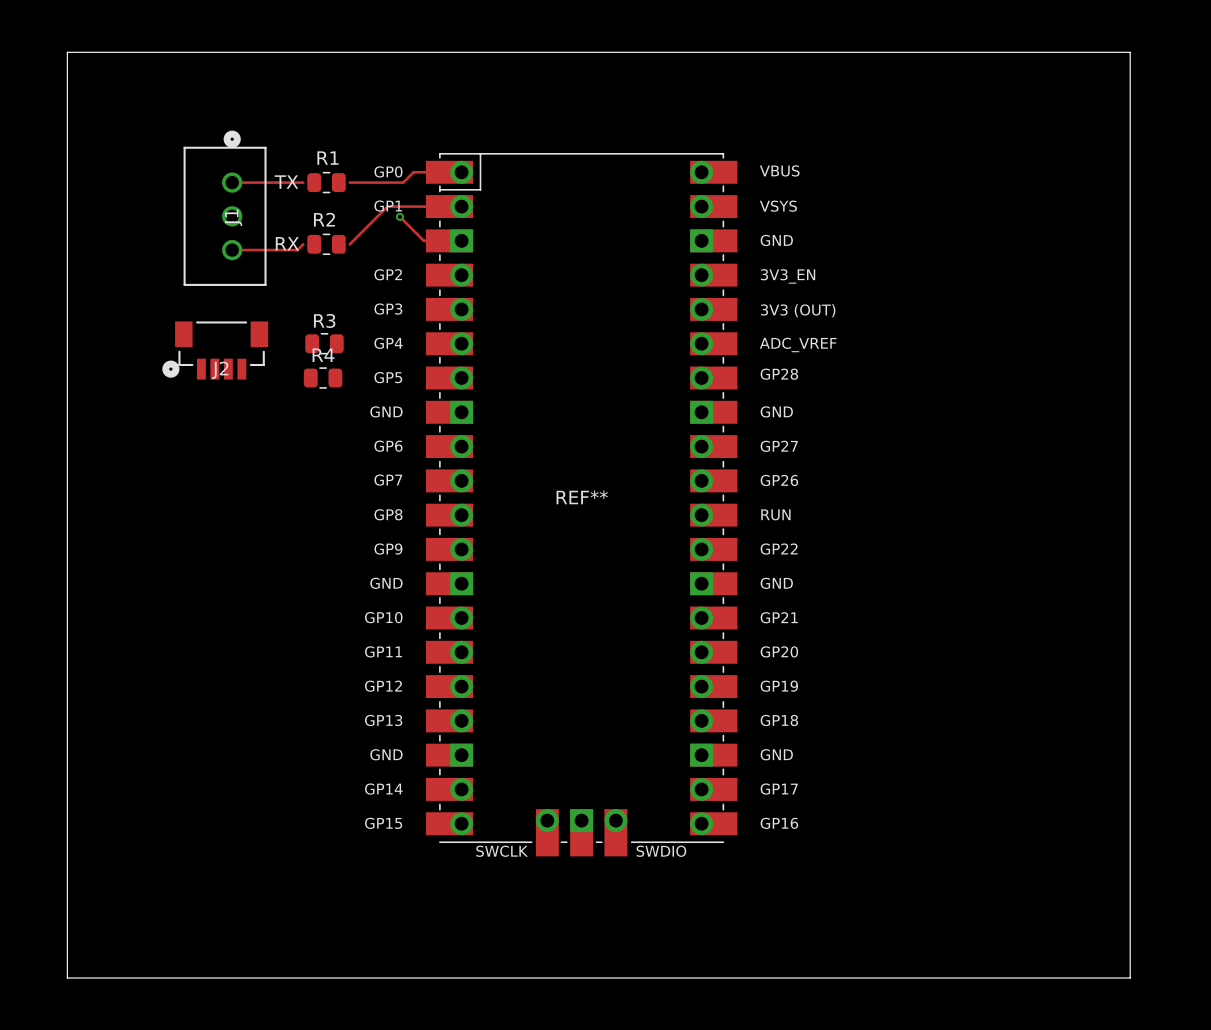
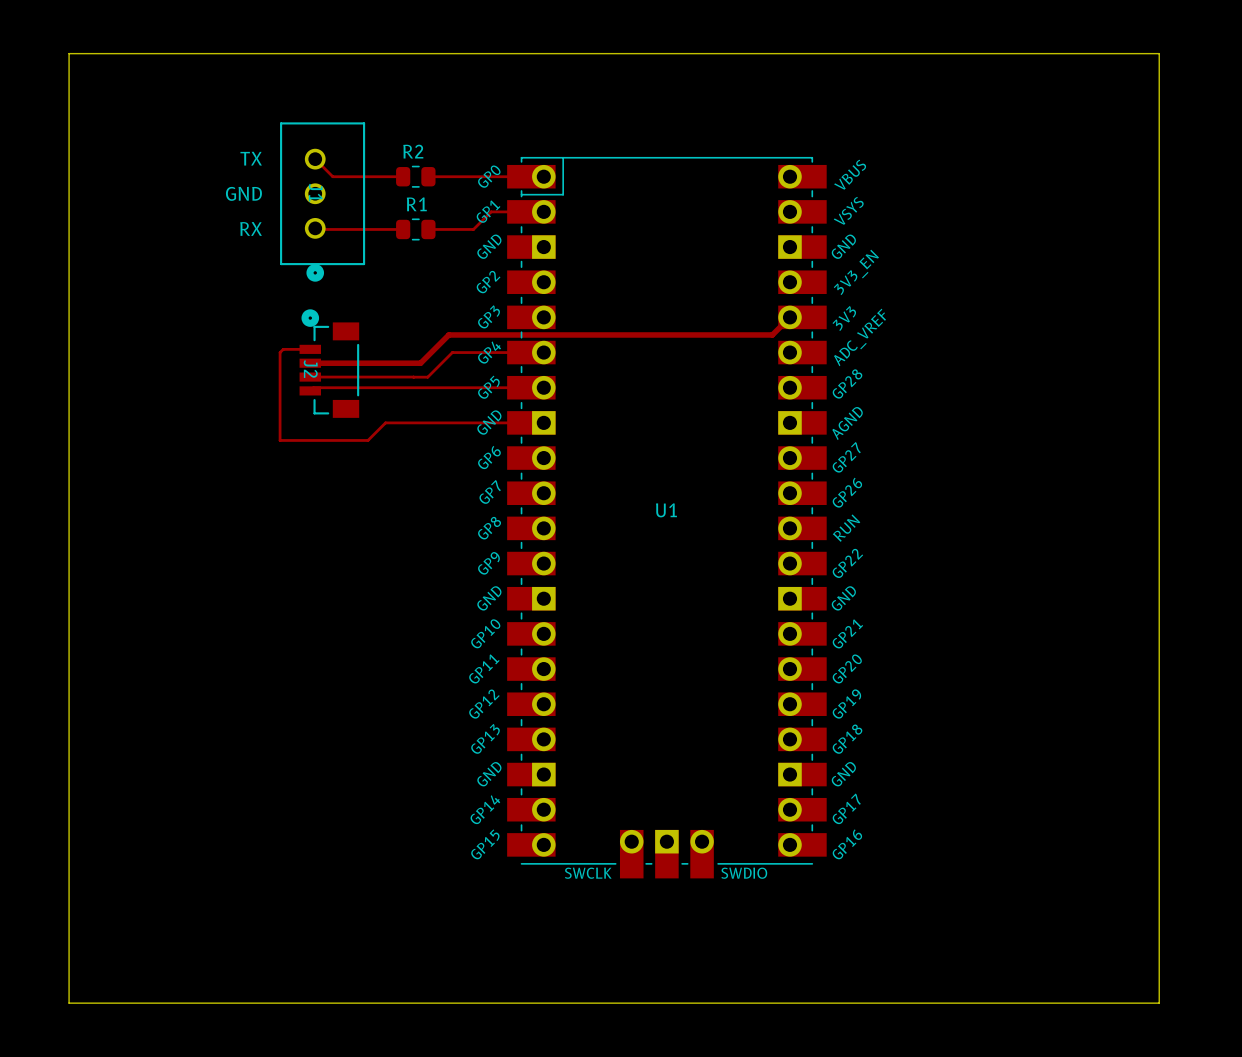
track: none -> (315, 159) (332, 176) (403, 176)
track: (417, 172) (413, 172) (403, 182) (349, 182) -> none
track: none -> (473, 176) (543, 176)
track: (232, 182) (303, 182) -> none
text position: TX (286, 182) -> TX (251, 158)
R1 position: (326, 182) -> (415, 229)
text: none -> GND (243, 193)
track: (461, 206) (387, 206) (349, 244) -> none
track: none -> (543, 211) (491, 211) (473, 229) (428, 229)
J1 rotation: 0° (225, 208) -> 180° (322, 202)
track: (399, 216) (423, 240) (461, 240) -> none
via: (399, 216) -> none
track: none -> (315, 228) (403, 229)
text position: RX (287, 243) -> RX (251, 228)
track: (303, 244) (297, 250) (232, 250) -> none
R2 position: (326, 244) -> (415, 176)
track: none -> (789, 317) (772, 334) (448, 334) (420, 363) (310, 363)
track: none -> (310, 349) (283, 349) (280, 352) (280, 440) (367, 440) (385, 422) (543, 422)
R3: (324, 343) -> none
track: none -> (543, 352) (452, 352) (427, 377) (413, 377)
J2 rotation: 0° (215, 350) -> 90° clockwise (329, 363)
J2 position: (215, 350) -> (329, 363)
track: none -> (310, 377) (413, 377)
R4: (323, 378) -> none
track: none -> (543, 387) (313, 387) (310, 390)
REF**: (581, 504) -> none
U1: none -> (666, 517)

